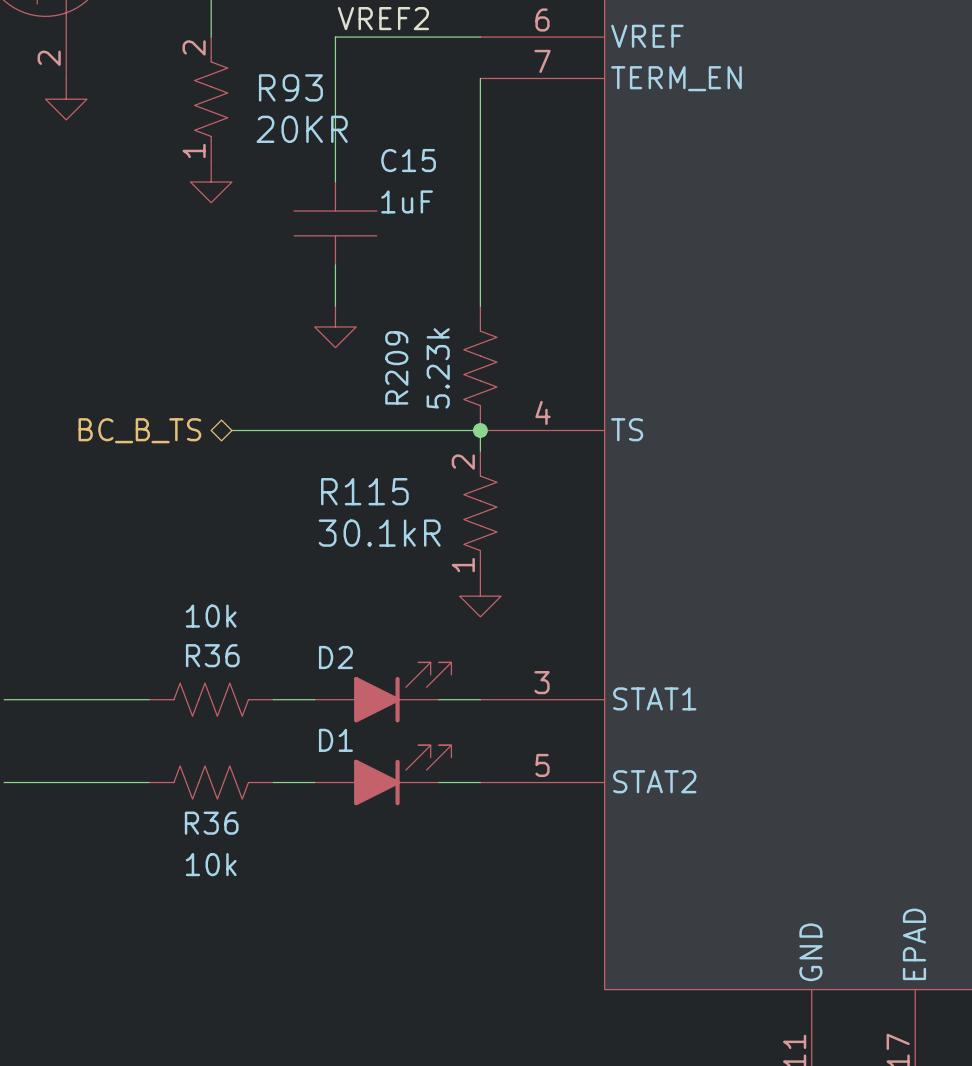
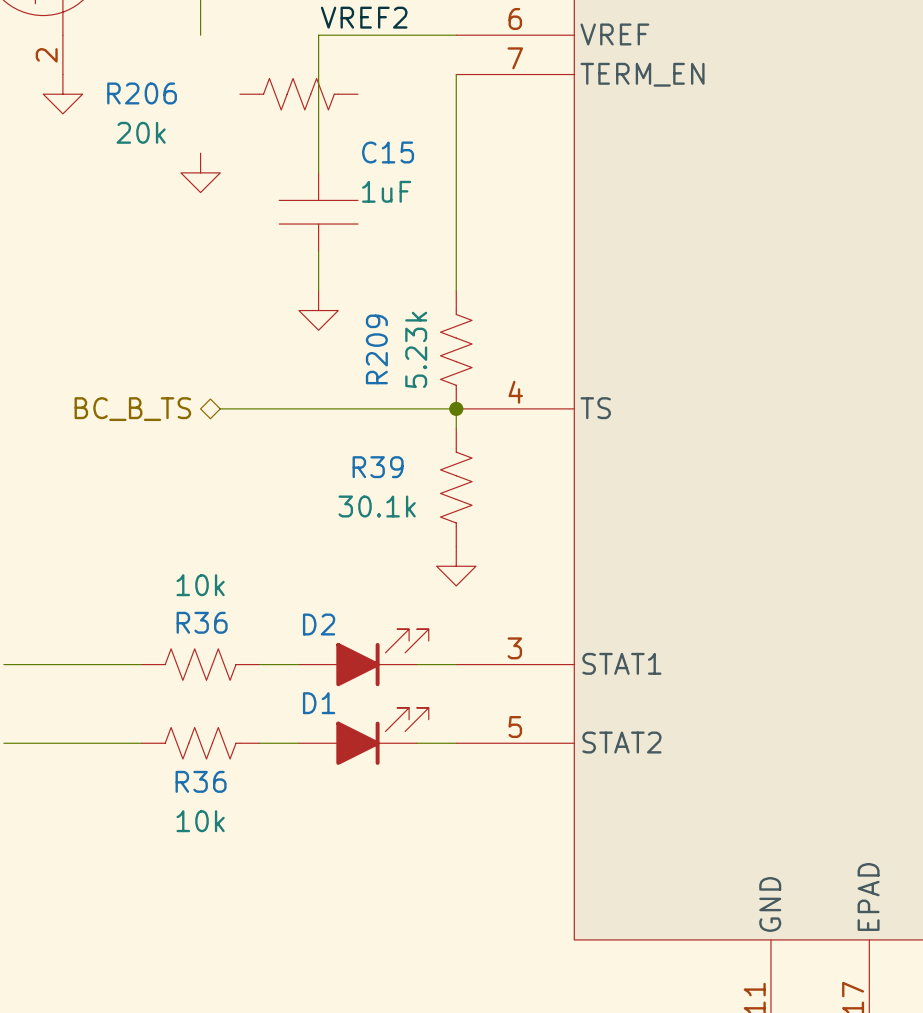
R93: 20KR (211, 99) -> none
R206: none -> 20k (298, 94)
R115 pin number: 2 (463, 462) -> none
R115 name: R115 (364, 491) -> R39 (378, 467)
R115 value: 30.1kR (379, 533) -> 30.1k (377, 506)
R115 pin number: 1 (463, 565) -> none

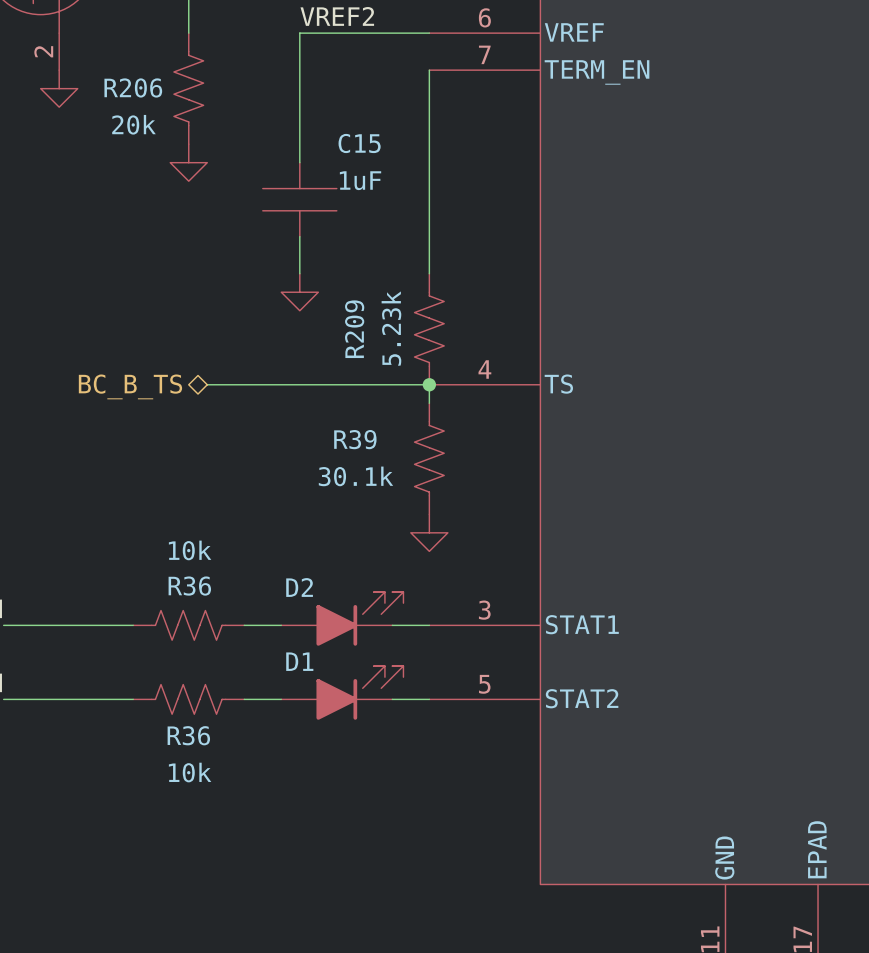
R206 rotation: 0° (298, 94) -> 90° clockwise (188, 88)
R206 position: (298, 94) -> (188, 88)

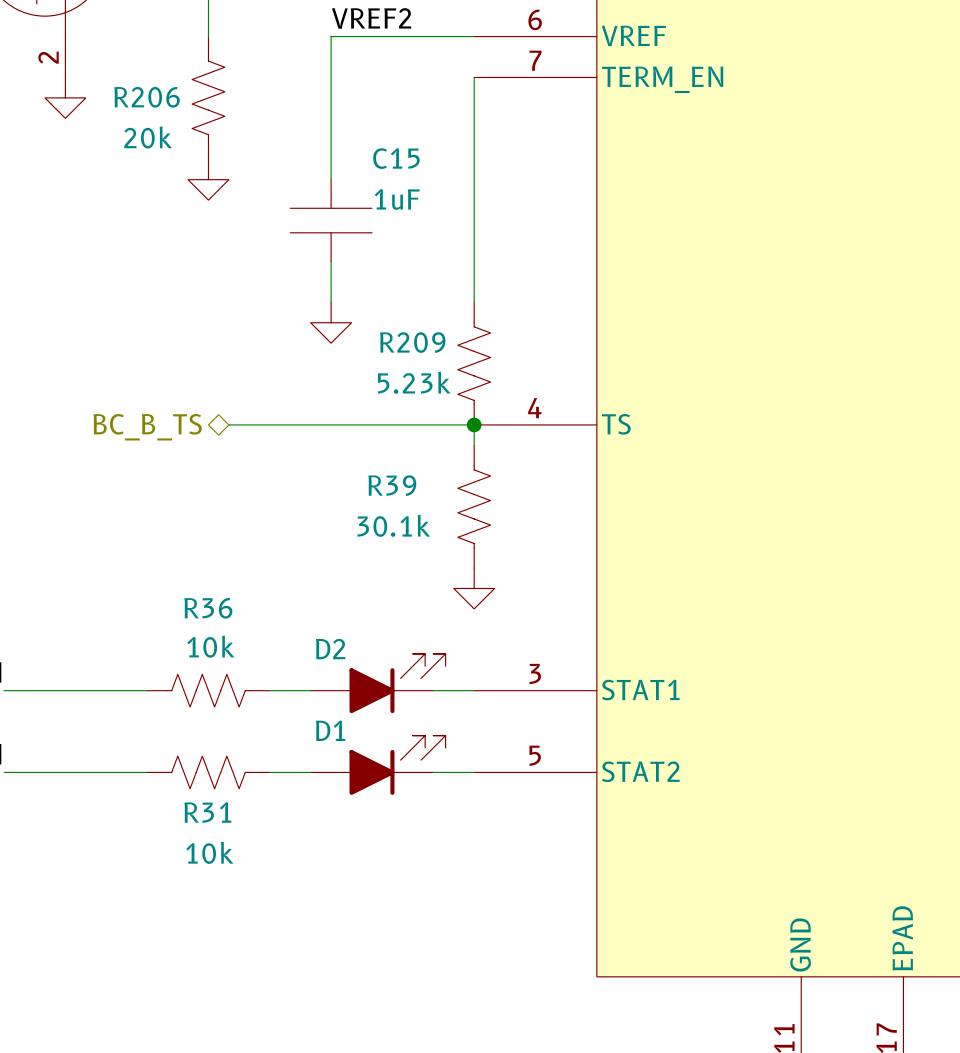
R209 value rotation: 0° (391, 328) -> 90° clockwise (414, 382)
R209 name rotation: 0° (354, 329) -> 90° clockwise (412, 342)
R36 value position: 10k (190, 550) -> 10k (210, 646)
R36 name position: R36 (189, 586) -> R36 (208, 608)
R36 name: R36 (188, 735) -> R31 (207, 812)

